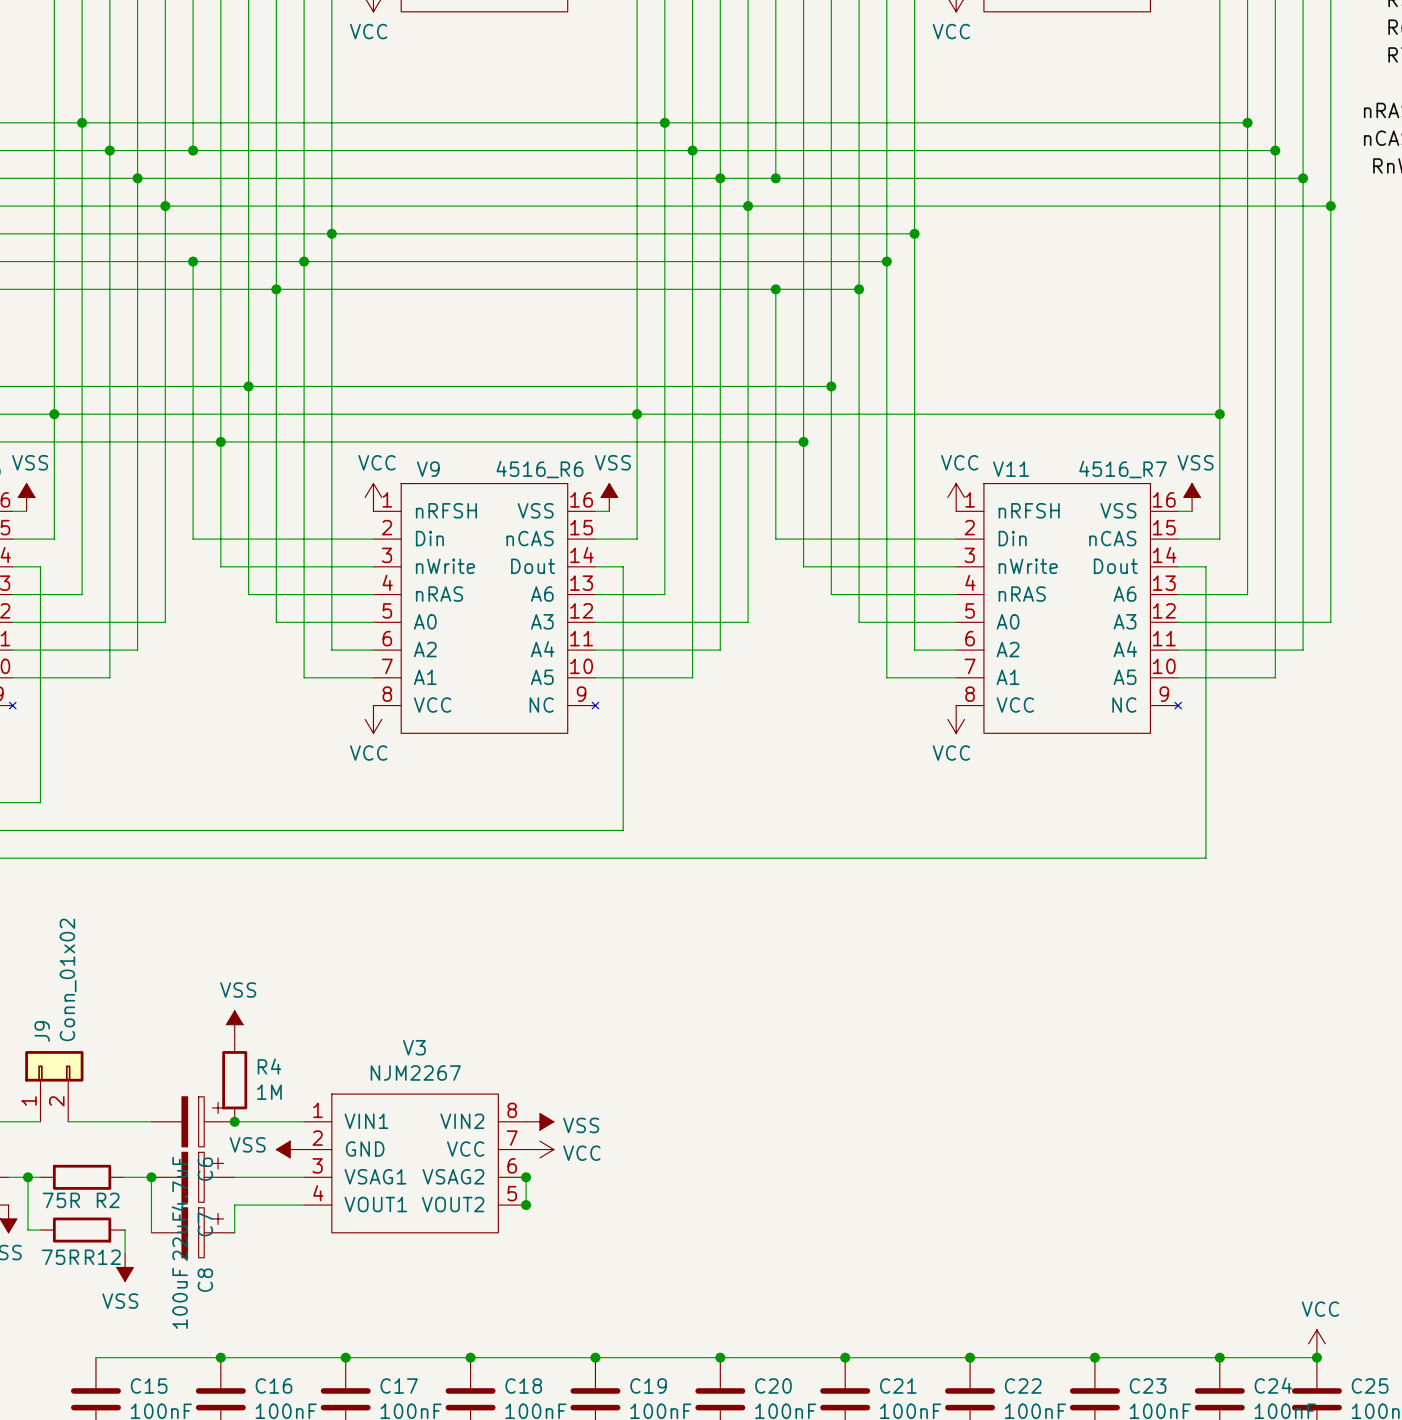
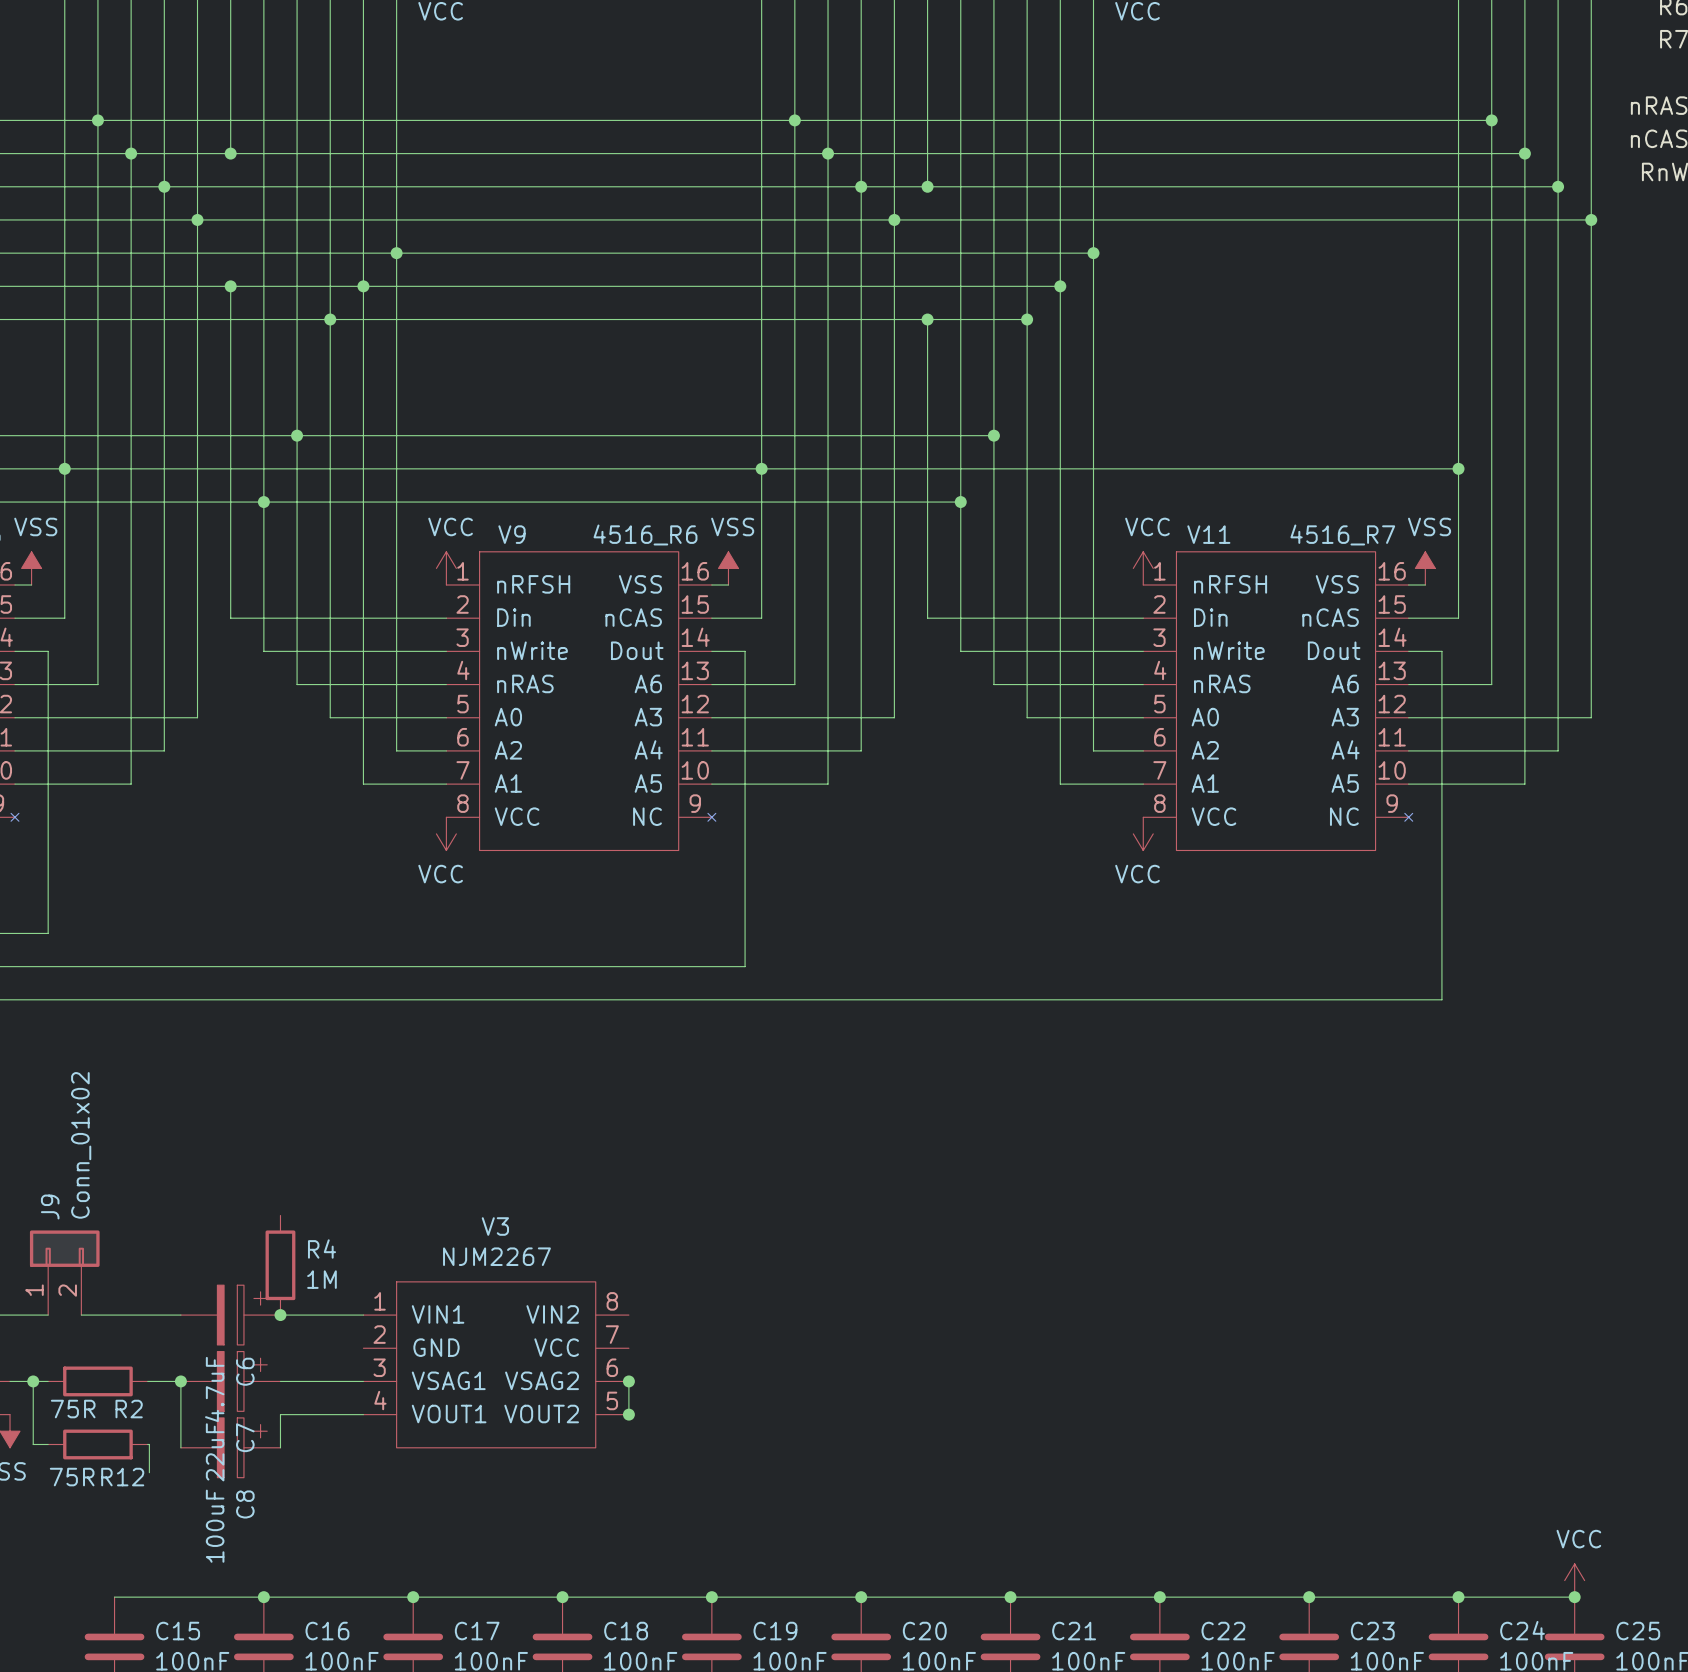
power symbol: VSS (234, 1024) -> none
power symbol: VSS (539, 1121) -> none
power symbol: VSS (290, 1149) -> none
power symbol: VCC (539, 1149) -> none
power symbol: VSS (125, 1267) -> none

